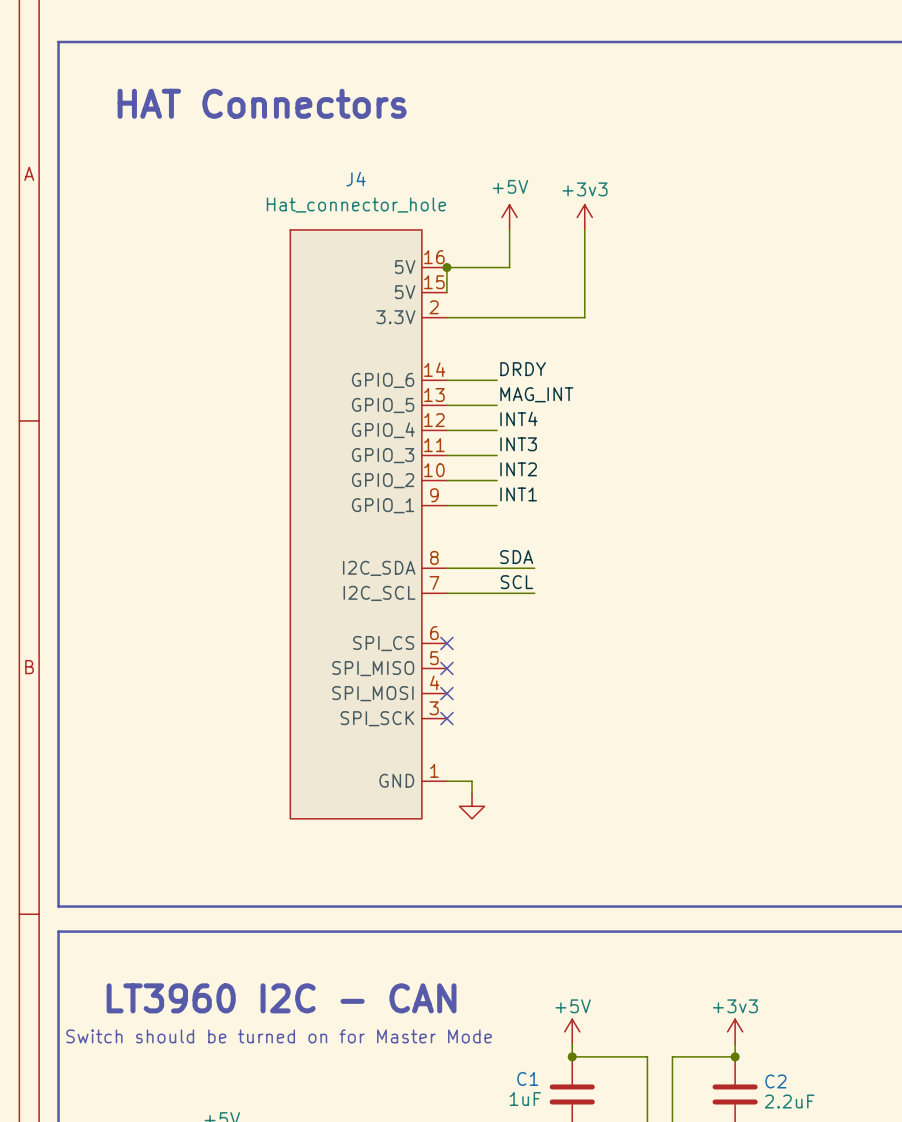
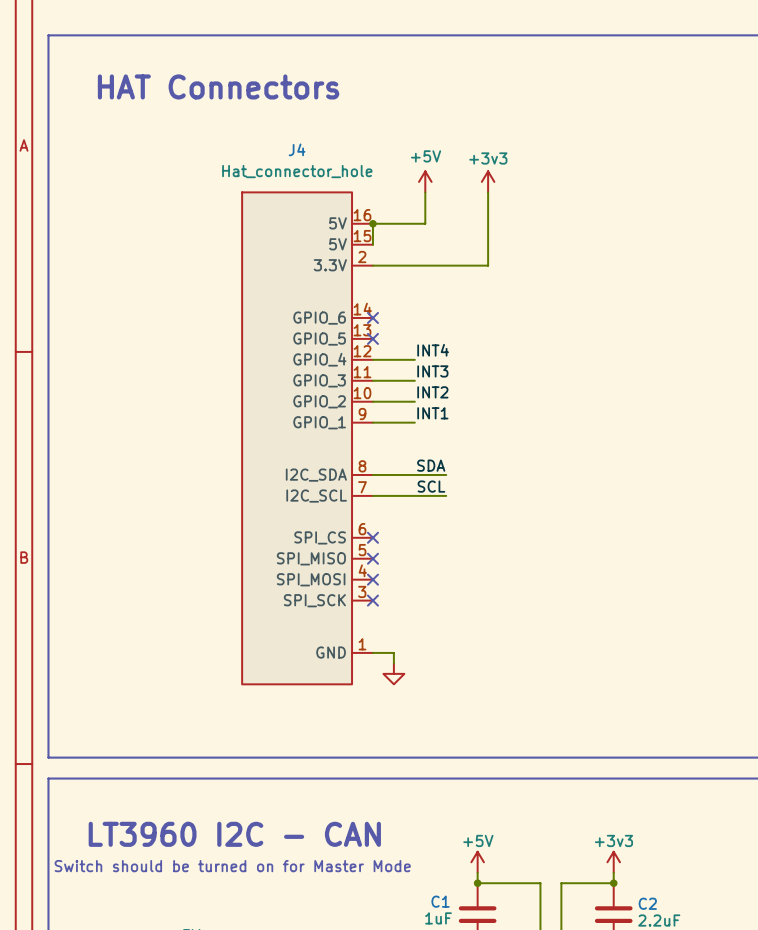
label: DRDY (523, 369) -> none
wire: (446, 380) (497, 380) -> none
no-connect mark: none -> (372, 317)
label: MAG_INT (536, 394) -> none
wire: (446, 405) (497, 405) -> none
no-connect mark: none -> (372, 338)

